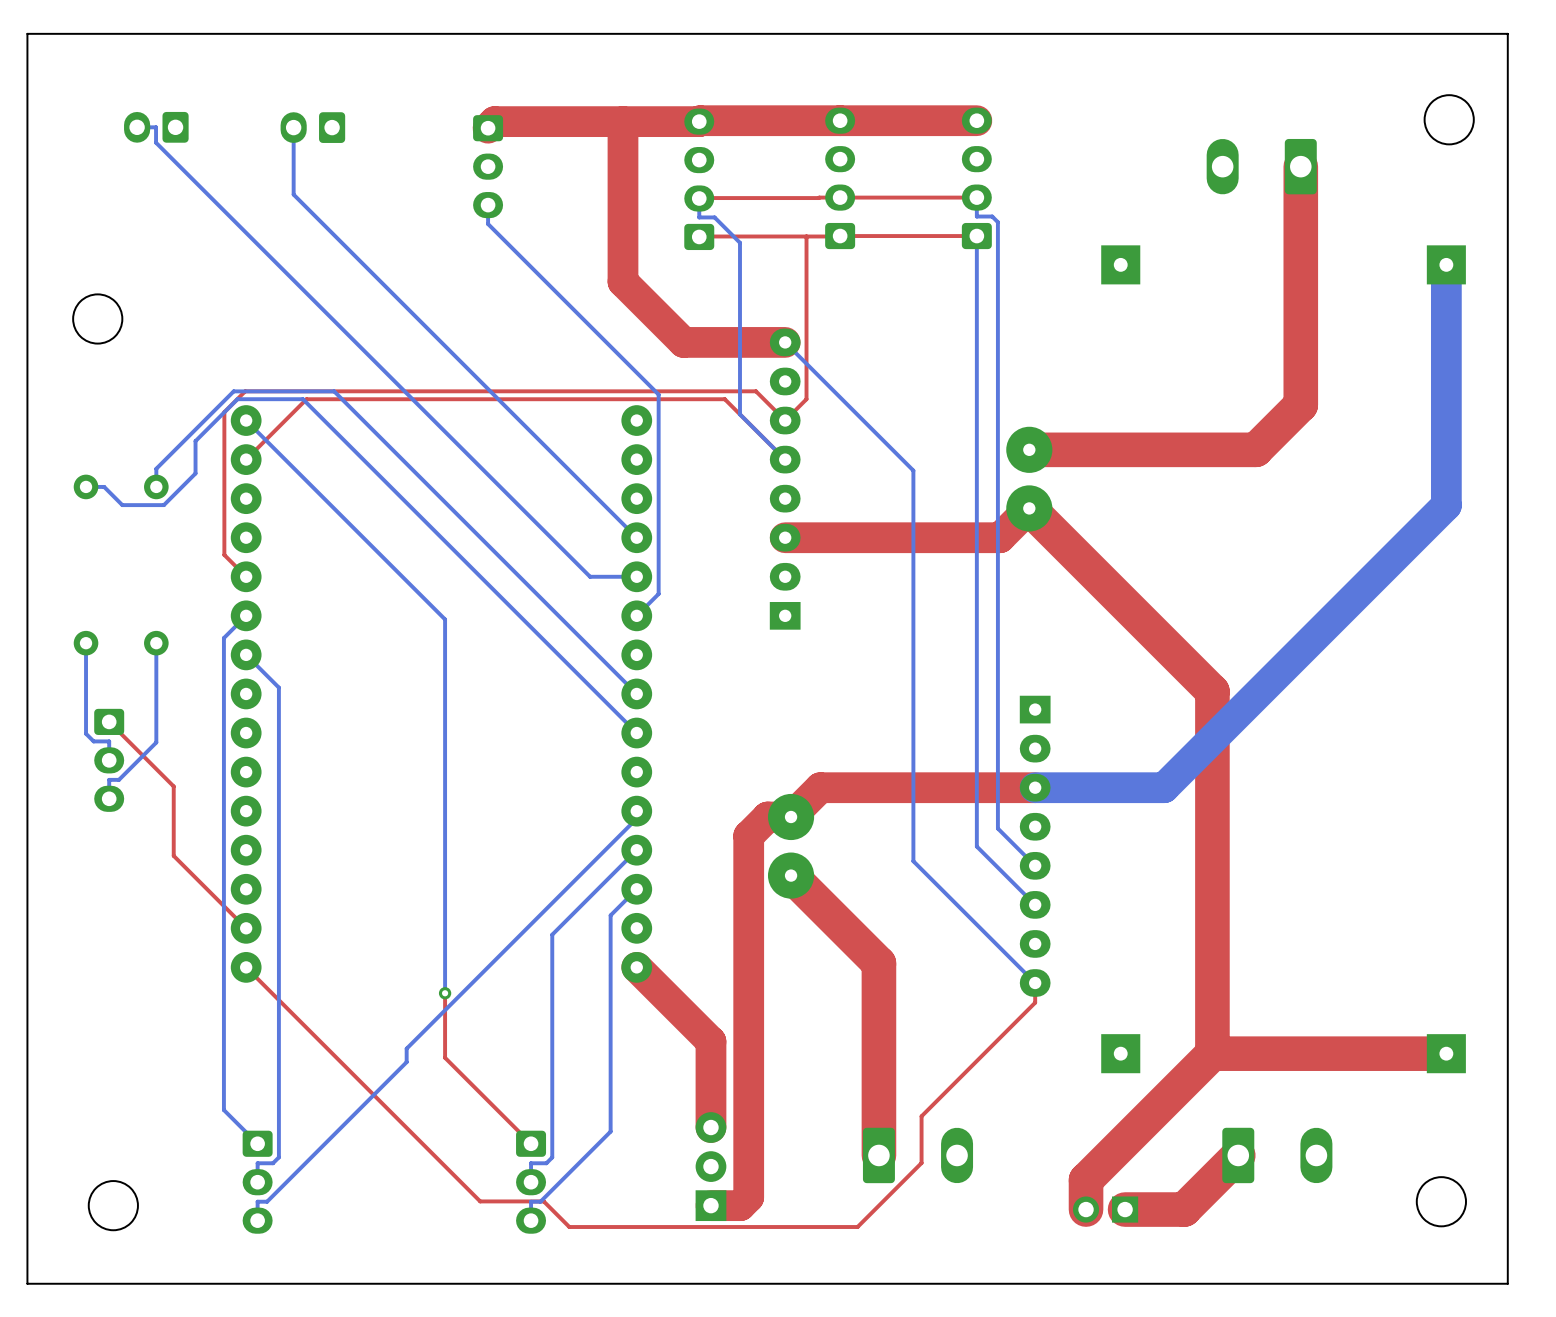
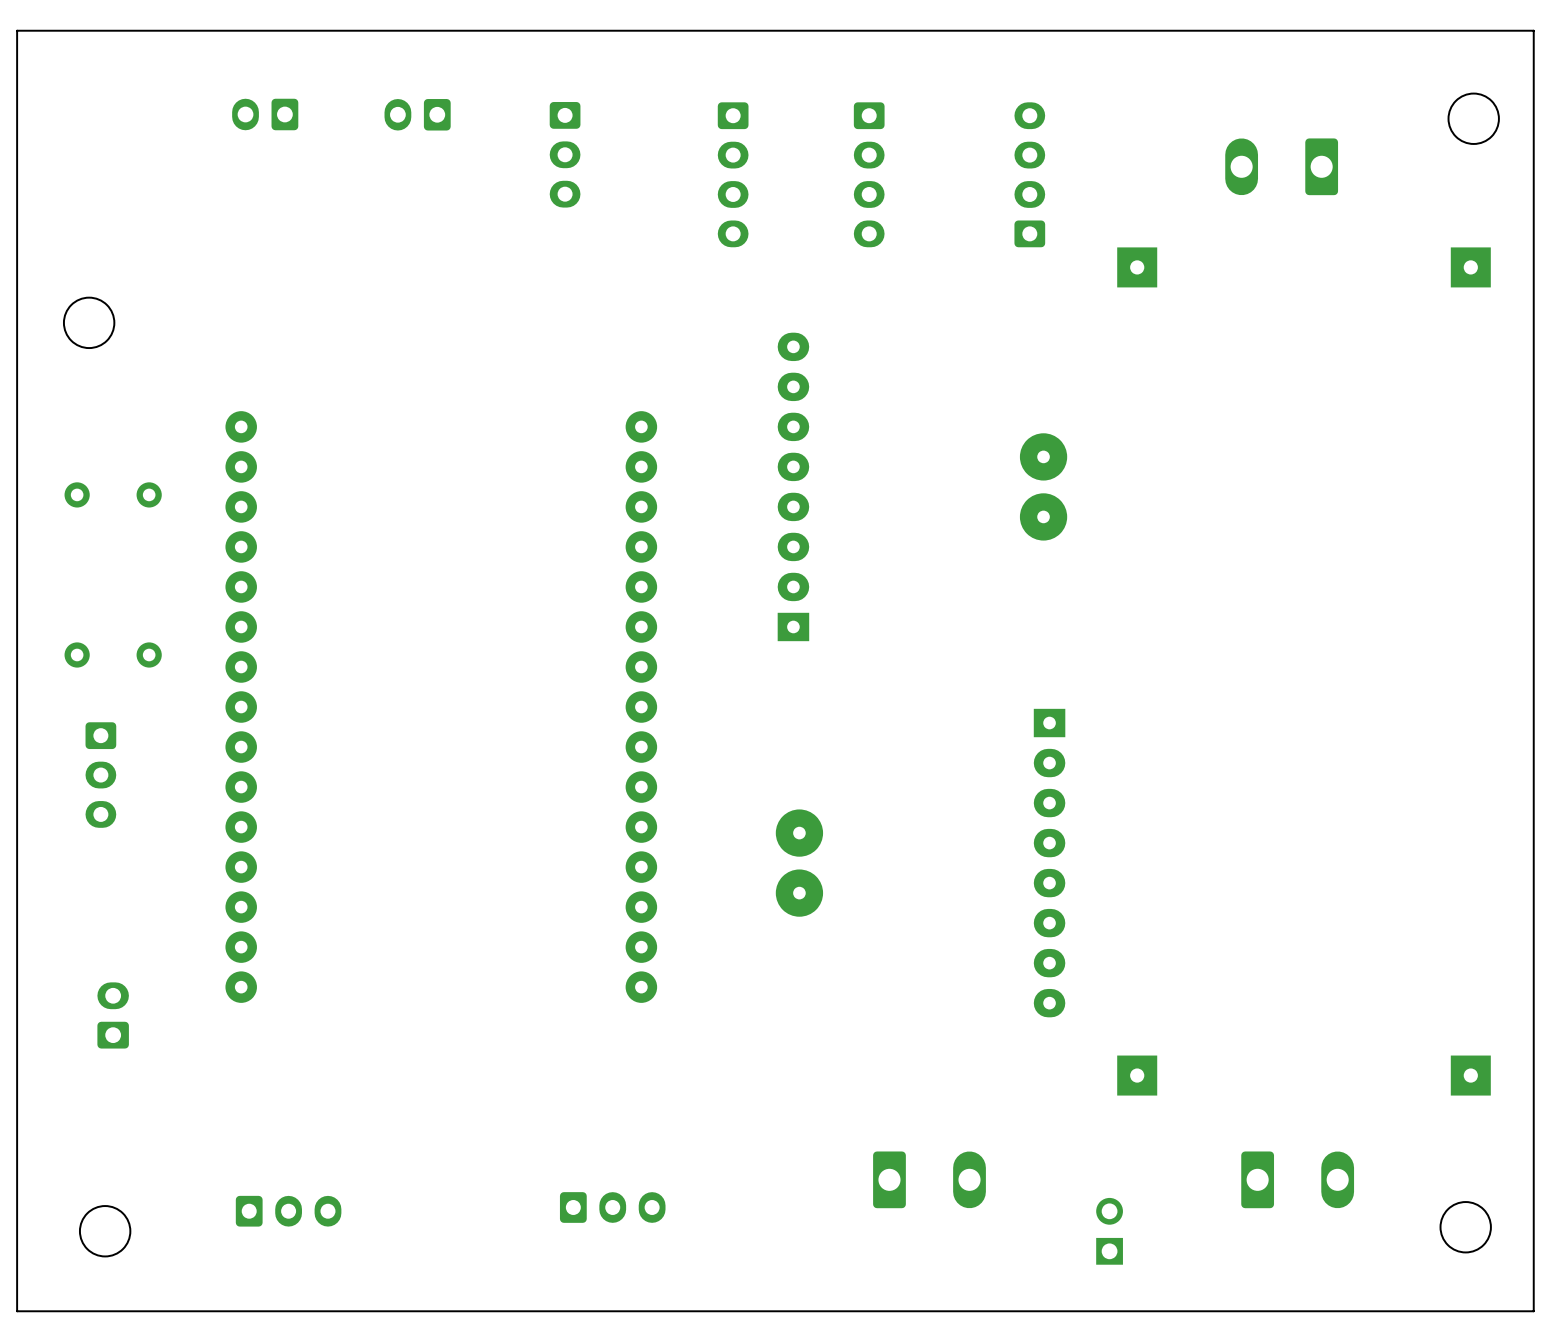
part: none -> (417, 114)
top track: (976, 120) (494, 121) (488, 128) -> none
top track: (622, 121) (622, 281) (683, 342) (785, 342) -> none
bottom track: (137, 127) (156, 127) (156, 142) (590, 576) (636, 576) -> none
part: (156, 127) -> none
bottom track: (293, 127) (293, 194) (636, 537) -> none
part position: (312, 127) -> (265, 114)
part position: (488, 166) -> (565, 154)
top track: (1300, 166) (1300, 404) (1255, 449) (1029, 449) -> none
part rotation: 0° (840, 178) -> 180° (869, 174)
part position: (976, 178) -> (1029, 174)
part rotation: 0° (699, 179) -> 180° (733, 174)
top track: (976, 197) (699, 198) -> none
bottom track: (976, 197) (976, 216) (992, 216) (997, 222) (997, 828) (1035, 865) -> none
bottom track: (699, 198) (699, 217) (714, 217) (739, 242) (739, 414) (785, 459) -> none
bottom track: (488, 205) (488, 224) (658, 394) (658, 593) (636, 615) -> none
top track: (806, 236) (806, 399) (785, 420) (755, 391) (245, 391) (224, 412) (224, 554) (246, 576) -> none
top track: (976, 236) (699, 236) -> none
bottom track: (976, 236) (976, 846) (1035, 904) -> none
bottom track: (1446, 264) (1446, 505) (1164, 787) (1035, 787) -> none
bottom track: (785, 342) (913, 470) (913, 861) (1035, 983) -> none
bottom track: (246, 420) (445, 619) (445, 993) -> none
top track: (785, 459) (724, 399) (306, 399) (246, 459) -> none
bottom track: (86, 486) (104, 486) (122, 505) (163, 505) (195, 473) (195, 441) (237, 399) (302, 399) (636, 733) -> none
bottom track: (156, 486) (156, 468) (233, 391) (334, 391) (636, 693) -> none
top track: (785, 537) (1000, 537) (1029, 508) (1212, 691) (1212, 1053) -> none
bottom track: (246, 615) (223, 638) (223, 1110) (257, 1143) -> none
bottom track: (86, 643) (86, 733) (93, 741) (109, 741) (109, 760) -> none
bottom track: (156, 643) (156, 742) (118, 779) (109, 779) (109, 798) -> none
bottom track: (246, 654) (278, 687) (278, 1157) (273, 1163) (257, 1163) (257, 1182) -> none
top track: (109, 721) (173, 786) (173, 855) (246, 928) -> none
top track: (1035, 787) (820, 787) (791, 816) (767, 816) (748, 835) (748, 1197) (740, 1205) (710, 1205) -> none
bottom track: (636, 811) (636, 818) (406, 1048) (406, 1062) (267, 1201) (257, 1201) (257, 1220) -> none
bottom track: (636, 850) (552, 934) (552, 1157) (546, 1163) (531, 1163) (531, 1182) -> none
top track: (791, 875) (878, 963) (878, 1155) -> none
bottom track: (636, 889) (610, 915) (610, 1131) (540, 1201) (531, 1201) (531, 1220) -> none
top track: (246, 967) (480, 1201) (543, 1201) (569, 1227) (857, 1227) (921, 1163) (921, 1116) (1035, 1002) (1035, 983) -> none
top track: (636, 967) (710, 1041) (710, 1127) -> none
top track: (445, 993) (445, 1057) (531, 1143) -> none
via: (445, 993) -> none
part: none -> (113, 1015)
top track: (1212, 1053) (1086, 1180) (1086, 1209) -> none
top track: (1446, 1053) (1212, 1053) -> none
top track: (1238, 1155) (1184, 1209) (1125, 1209) -> none
part: (710, 1166) -> none
part rotation: 0° (257, 1182) -> 90° counterclockwise (288, 1211)
part rotation: 0° (531, 1182) -> 90° counterclockwise (612, 1207)
part position: (531, 1182) -> (612, 1207)
part rotation: 0° (1105, 1209) -> 90° clockwise (1109, 1231)

